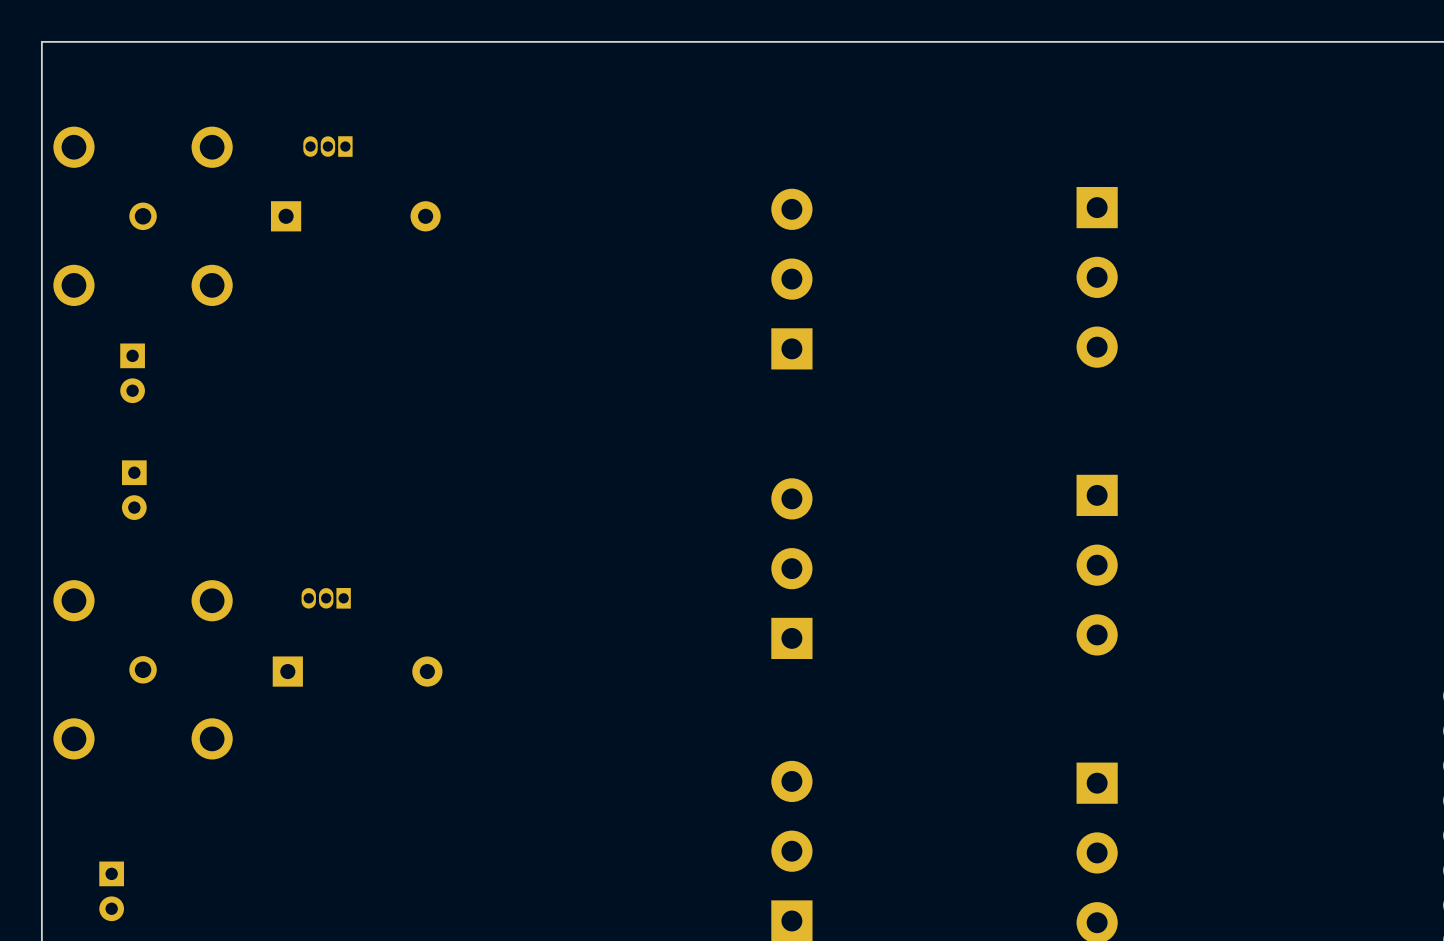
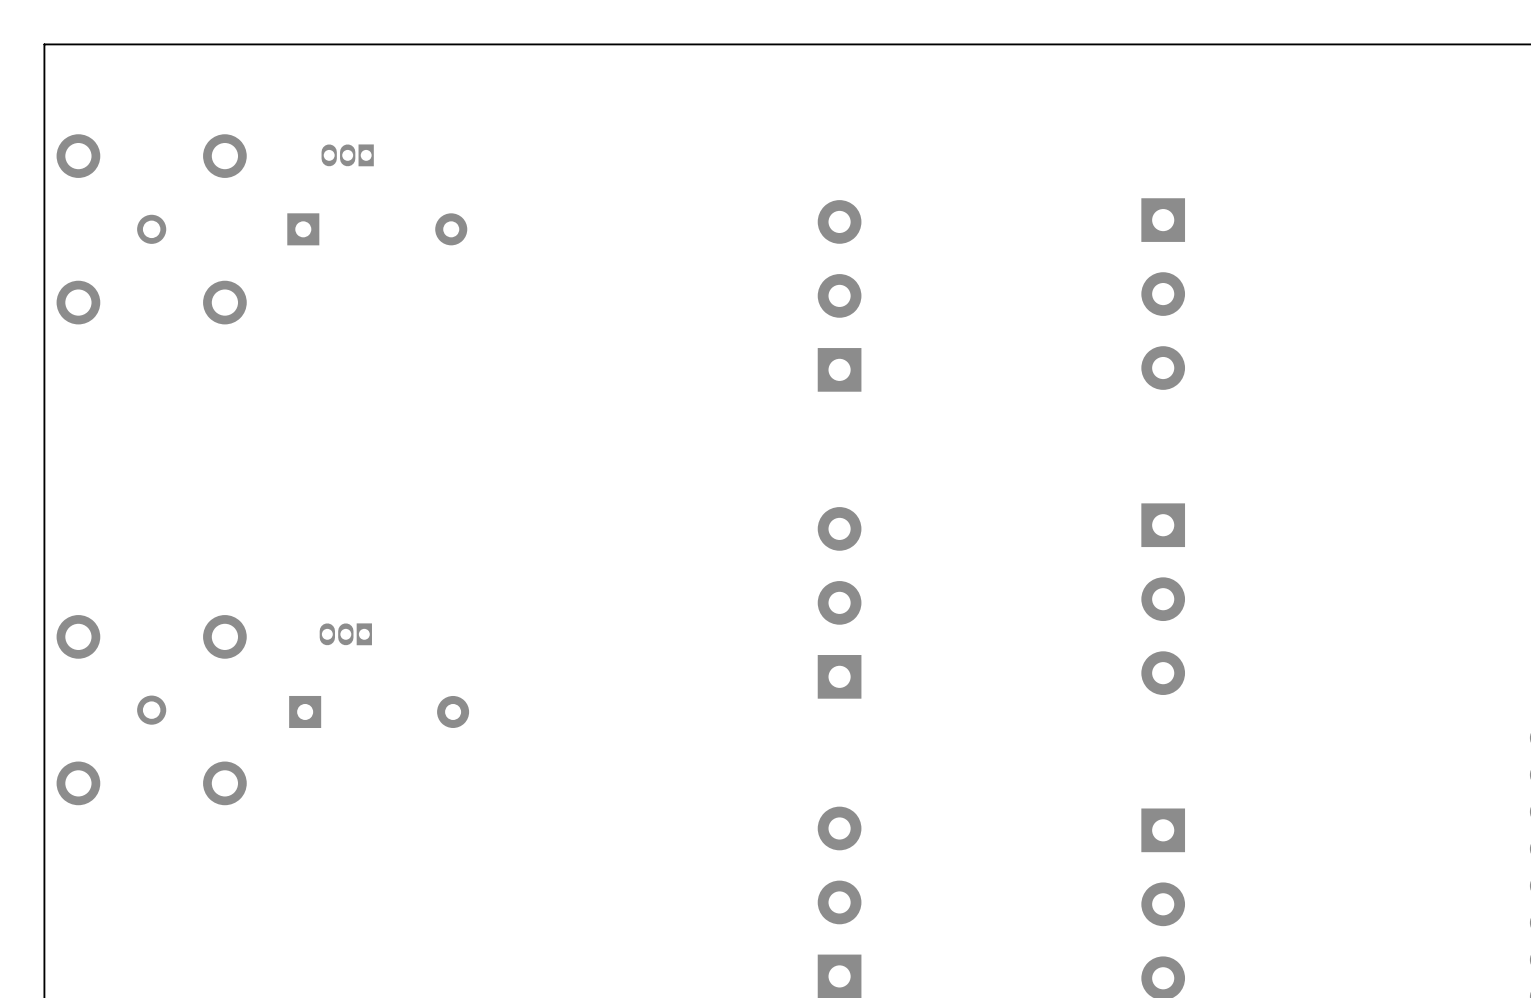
part: (132, 373) -> none
part: (134, 490) -> none
part: (111, 891) -> none

